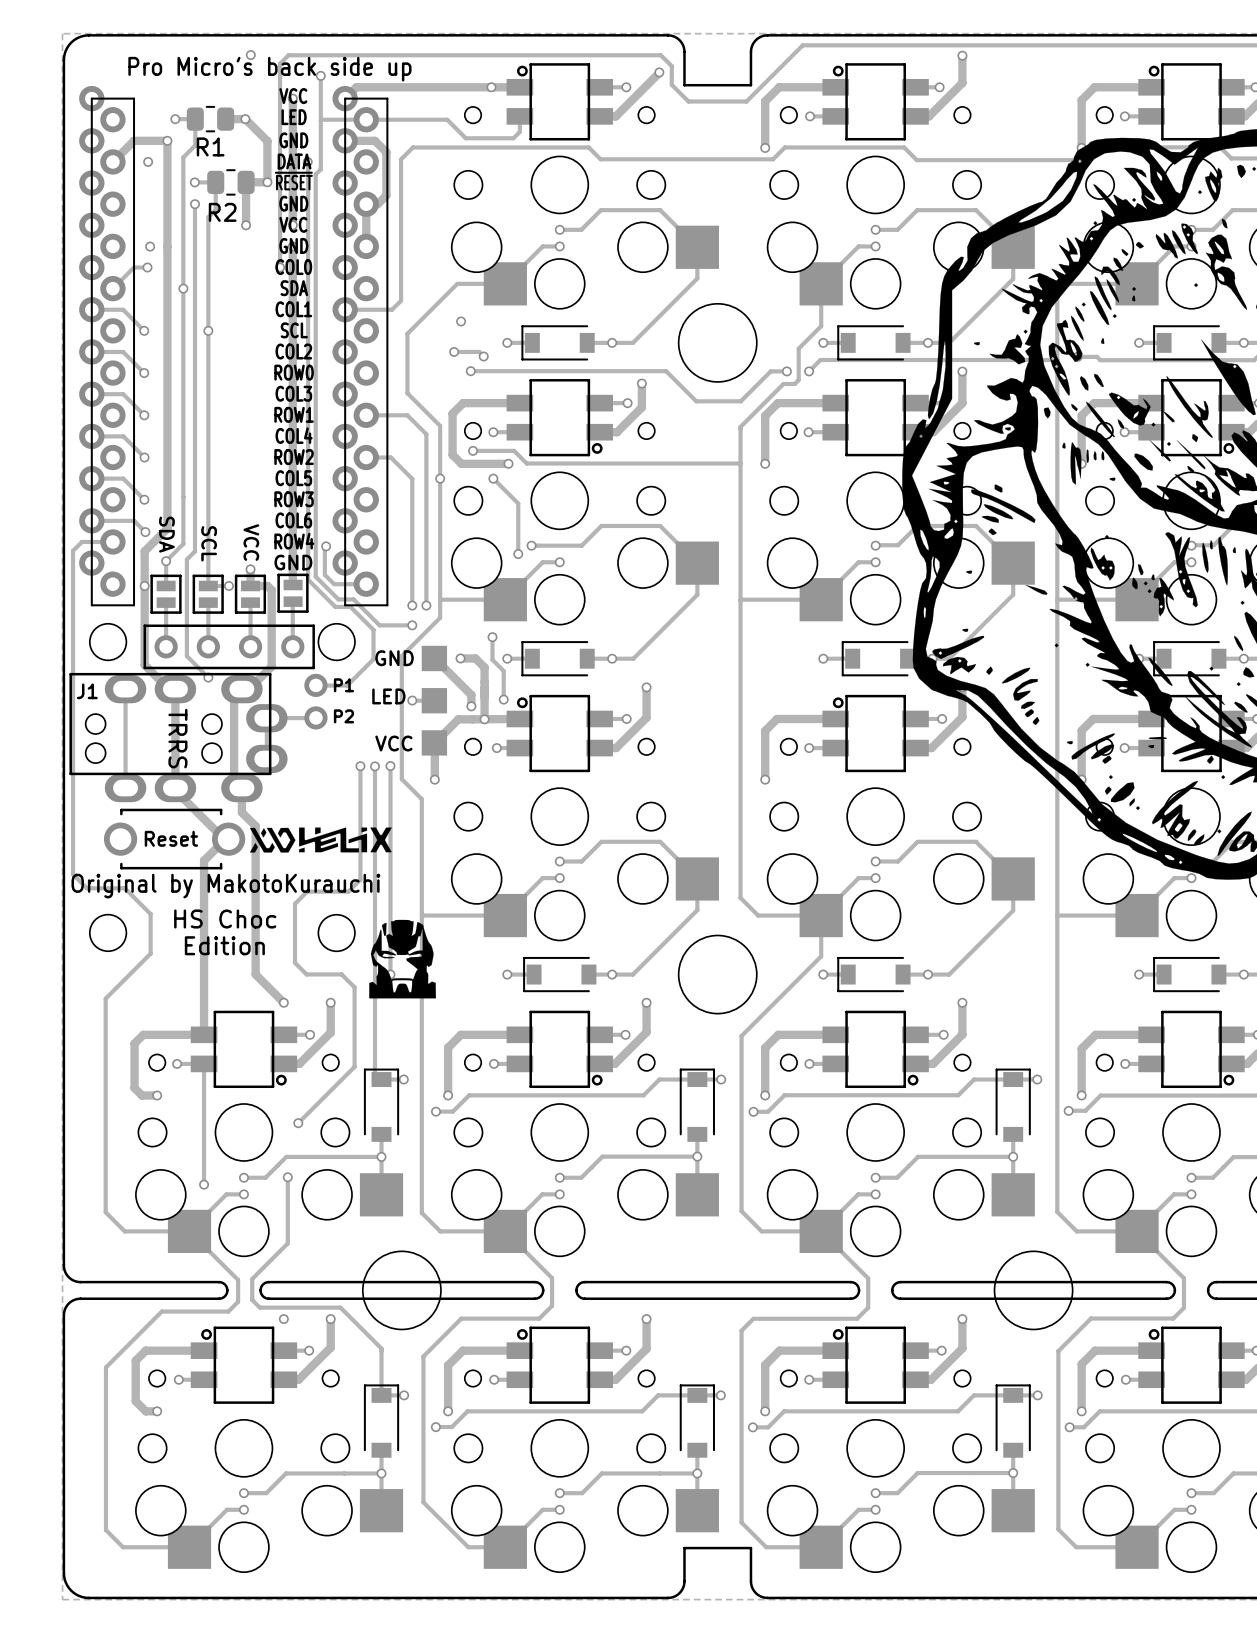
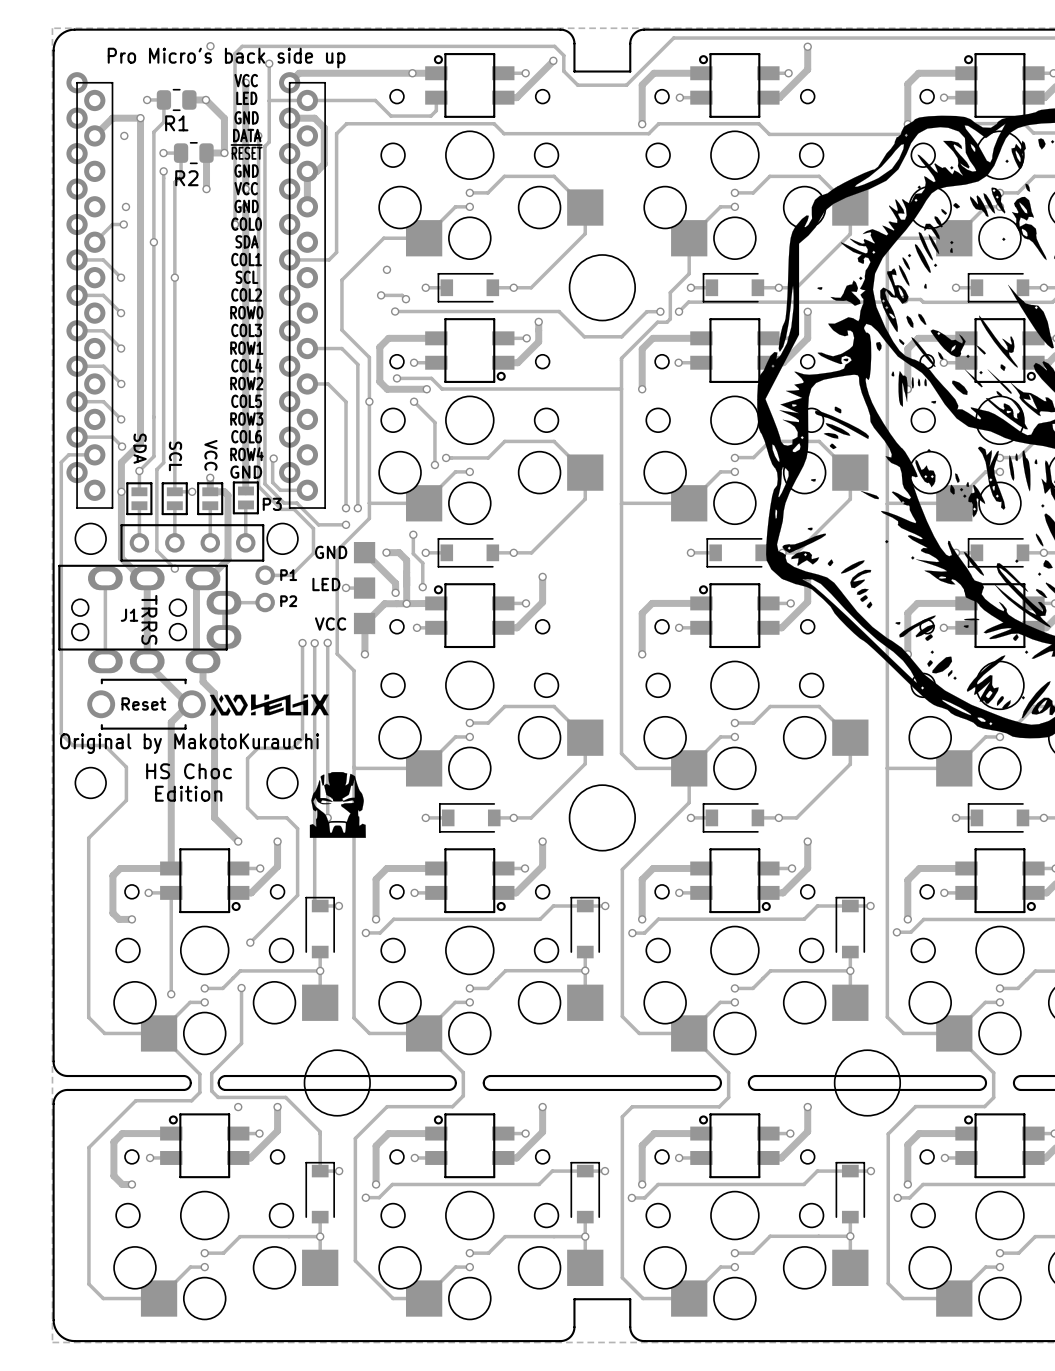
text: none -> P3 (272, 504)
text position: J1 (87, 691) -> J1 (129, 615)

